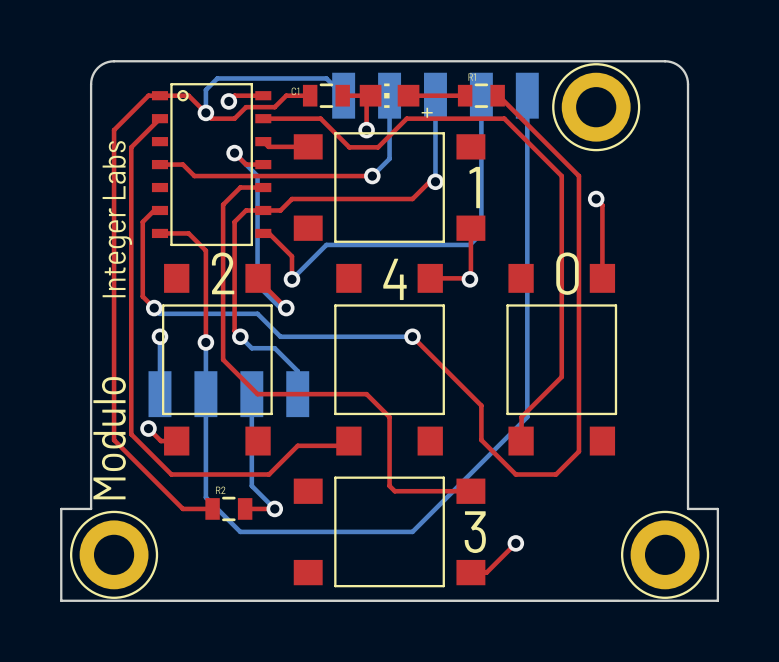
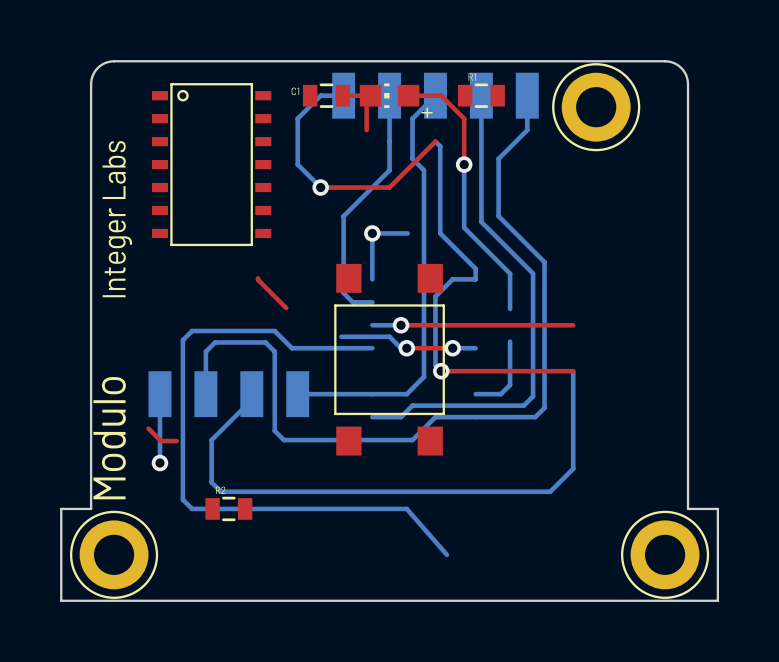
top track: (263, 95) (234, 95) (228, 101) -> none
top track: (310, 95) (286, 95) (274, 107) (246, 107) (234, 118) (211, 118) (188, 95) (148, 95) (114, 130) (114, 440) (182, 508) (212, 508) -> none
bottom track: (343, 95) (326, 78) (217, 78) (205, 89) (205, 112) -> (343, 95) (320, 95) (297, 118) (297, 164) (320, 187)
bottom track: (435, 95) (435, 181) -> (435, 95) (412, 118) (412, 158) (424, 170) (424, 376) (406, 394) (297, 394)
top track: (441, 95) (465, 95) -> (441, 95) (464, 118) (464, 164)
top track: (497, 95) (578, 176) (578, 451) (556, 474) (515, 474) (481, 440) (481, 405) (412, 336) -> none
via: (228, 101) -> none
via: (205, 112) -> none
top track: (159, 118) (131, 147) (131, 434) (171, 474) (269, 474) (297, 445) (344, 445) (348, 441) -> none
top track: (263, 118) (320, 118) (349, 147) (378, 147) (406, 118) (504, 118) (561, 176) (561, 376) (521, 417) (521, 441) -> none
via: (366, 130) -> none
bottom track: (527, 130) (527, 417) (412, 531) (240, 531) (205, 497) (205, 394) -> (527, 130) (498, 158) (498, 216) (544, 262) (544, 407) (535, 417) (435, 417) (412, 440) (283, 440) (274, 430) (274, 351) (265, 342) (215, 342) (205, 351)
top track: (263, 141) (268, 146) (308, 146) -> none
bottom track: none -> (435, 141) (440, 146) (440, 233) (475, 268) (475, 279) (452, 279) (435, 296) (435, 365) (441, 371)
top track: none -> (435, 141) (389, 187) (320, 187)
bottom track: (234, 153) (257, 176) (257, 285) (280, 308) (286, 308) -> none
top track: (234, 153) (246, 164) (263, 164) -> none
via: (234, 153) -> none
bottom track: (389, 158) (372, 176) -> (389, 158) (389, 170) (343, 216) (343, 293) (352, 302) (372, 302)
top track: (159, 164) (182, 164) (194, 176) (372, 176) -> none
bottom track: none -> (464, 164) (464, 227) (510, 273) (510, 309)
via: (372, 176) -> none
top track: (435, 181) (429, 181) (412, 199) (291, 199) (280, 210) (246, 210) (234, 221) (234, 331) (240, 336) -> none
via position: (435, 181) -> (464, 164)
top track: (263, 187) (240, 187) (223, 204) (223, 359) (257, 394) (366, 394) (389, 417) (389, 485) (394, 491) (470, 491) -> none
via: none -> (320, 187)
part: (389, 187) -> none
text: 1 (474, 187) -> none
top track: (596, 199) (602, 205) (602, 278) -> none
via: (596, 199) -> none
top track: (159, 210) (154, 210) (142, 221) (142, 296) (154, 308) -> none
bottom track: (481, 221) (481, 233) (469, 244) (326, 244) (291, 279) -> (481, 221) (533, 273) (533, 396) (523, 405) (412, 405) (401, 417) (372, 417)
top track: (470, 228) (470, 278) (430, 278) -> none
top track: (159, 233) (188, 233) (205, 250) (205, 342) -> none
top track: (263, 233) (269, 233) (291, 256) (291, 279) -> none
via: none -> (372, 233)
bottom track: none -> (407, 233) (372, 233) (372, 279)
text: 2 (223, 273) -> none
text: 0 (567, 273) -> none
via: (291, 279) -> none
text: 4 (394, 279) -> none
via: (469, 279) -> none
bottom track: (154, 308) (159, 313) (257, 313) (274, 331) -> (446, 554) (406, 508) (192, 508) (182, 499) (182, 340) (192, 331) (274, 331)
via: (154, 308) -> none
via: (286, 308) -> none
bottom track: none -> (372, 325) (401, 325)
top track: none -> (401, 325) (573, 325)
via: none -> (401, 325)
bottom track: (159, 336) (159, 394) -> (159, 463) (159, 394)
via: (159, 336) -> none
bottom track: (240, 336) (251, 348) (274, 348) (297, 371) (297, 394) -> none
via: (240, 336) -> none
bottom track: (280, 336) (341, 336) -> (280, 336) (291, 348) (372, 348)
bottom track: (389, 336) (412, 336) -> (389, 336) (401, 348) (406, 348)
via: (412, 336) -> none
bottom track: none -> (510, 341) (510, 384) (500, 394) (475, 394)
via: (205, 342) -> none
top track: none -> (406, 348) (452, 348)
via: none -> (406, 348)
bottom track: none -> (452, 348) (475, 348)
via: none -> (452, 348)
part: (217, 359) -> none
part: (561, 359) -> none
top track: none -> (441, 371) (573, 371)
via: none -> (441, 371)
bottom track: (251, 399) (251, 485) (274, 508) -> (251, 399) (211, 440) (211, 482) (220, 491) (550, 491) (573, 468) (573, 371)
via position: (148, 428) -> (159, 463)
top track: (245, 508) (274, 508) -> none
via: (274, 508) -> none
part: (389, 531) -> none
text: 3 (475, 532) -> none
top track: (515, 543) (486, 572) (470, 572) -> none
via: (515, 543) -> none

